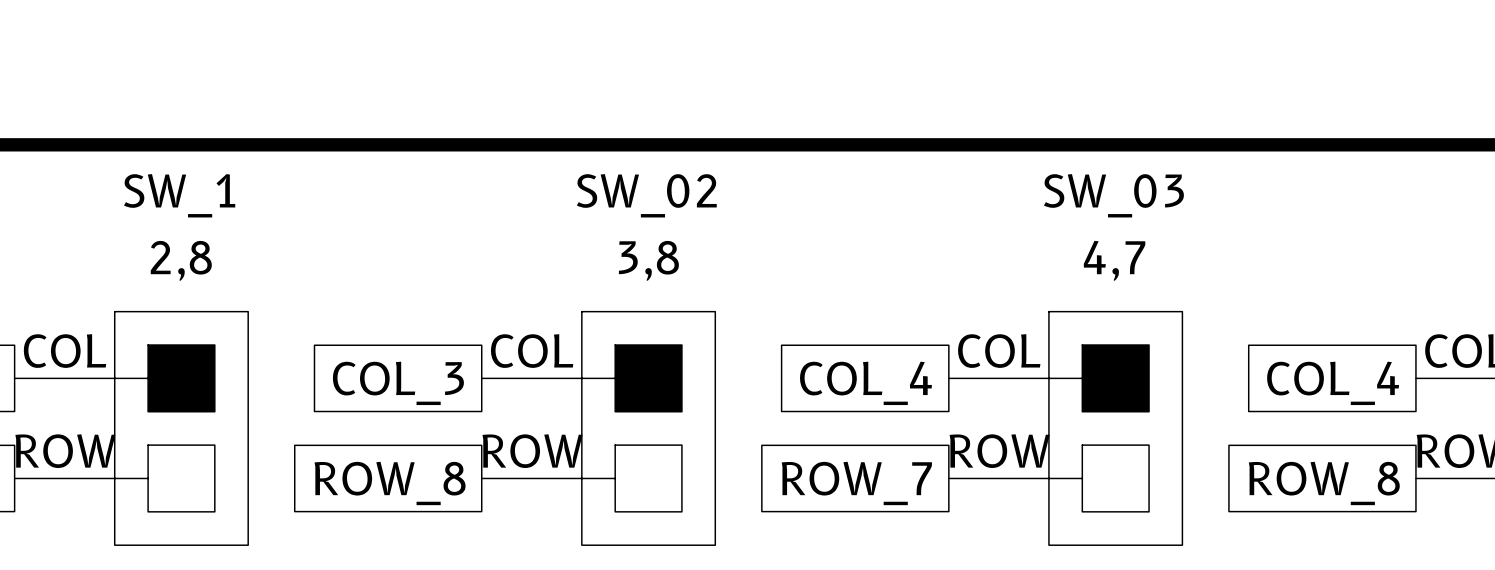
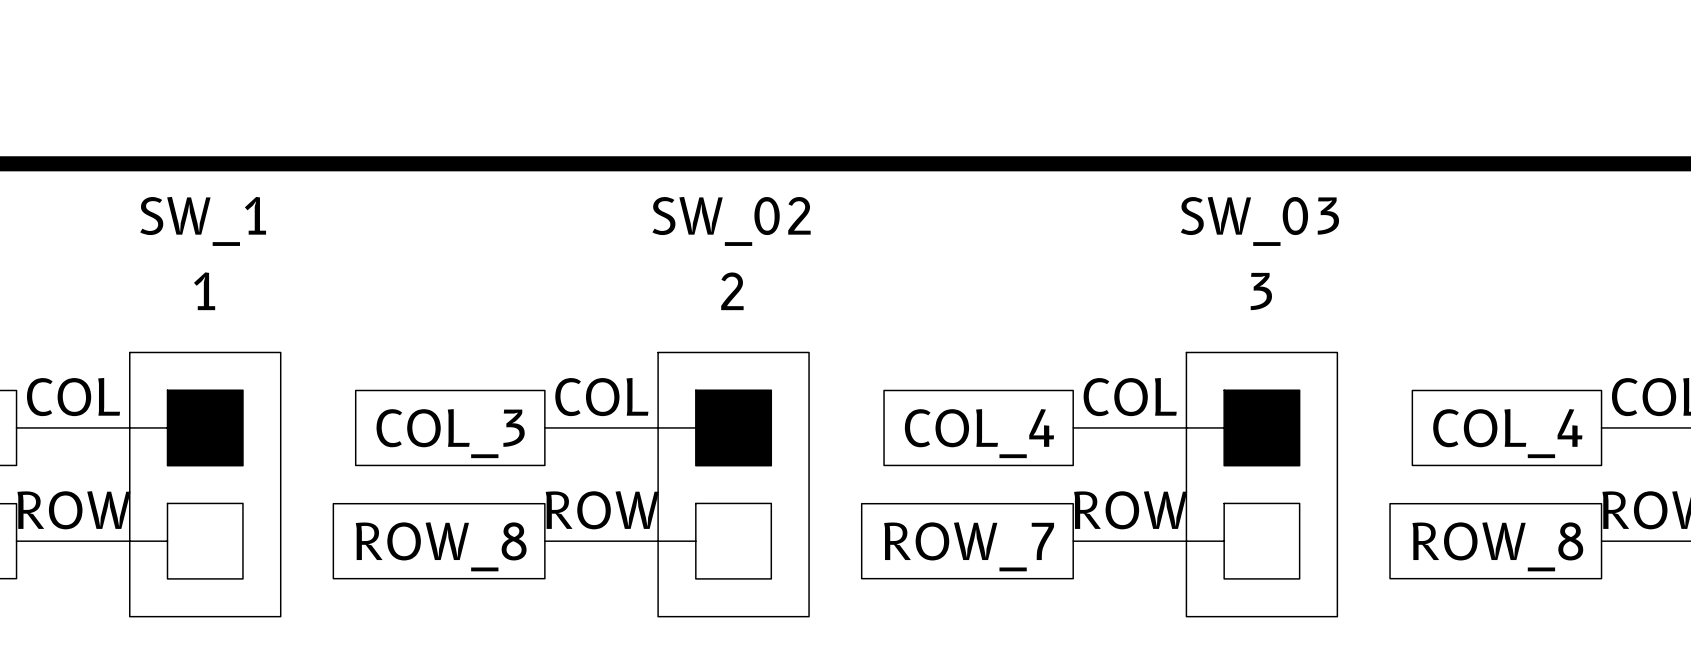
SW_1 value: 2,8 (181, 260) -> 1 (204, 291)
SW_02 value: 3,8 (648, 260) -> 2 (732, 291)
SW_03 value: 4,7 (1114, 260) -> 3 (1261, 291)

